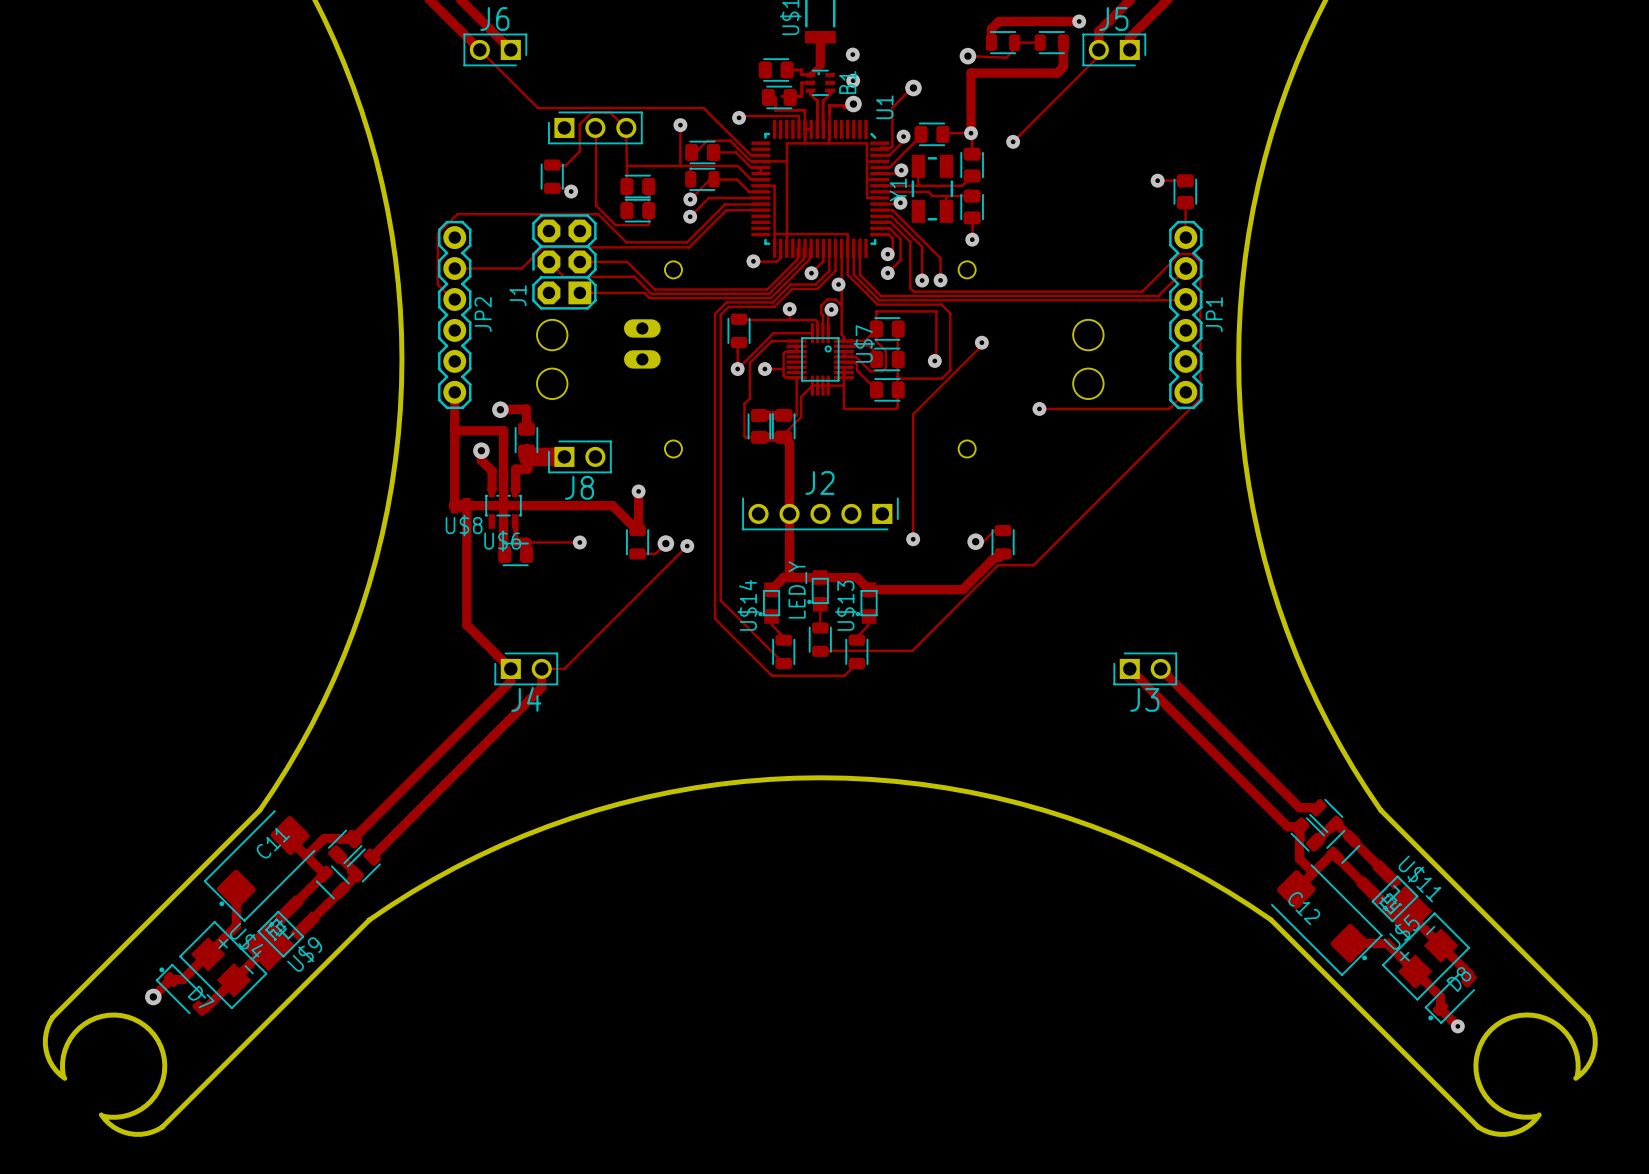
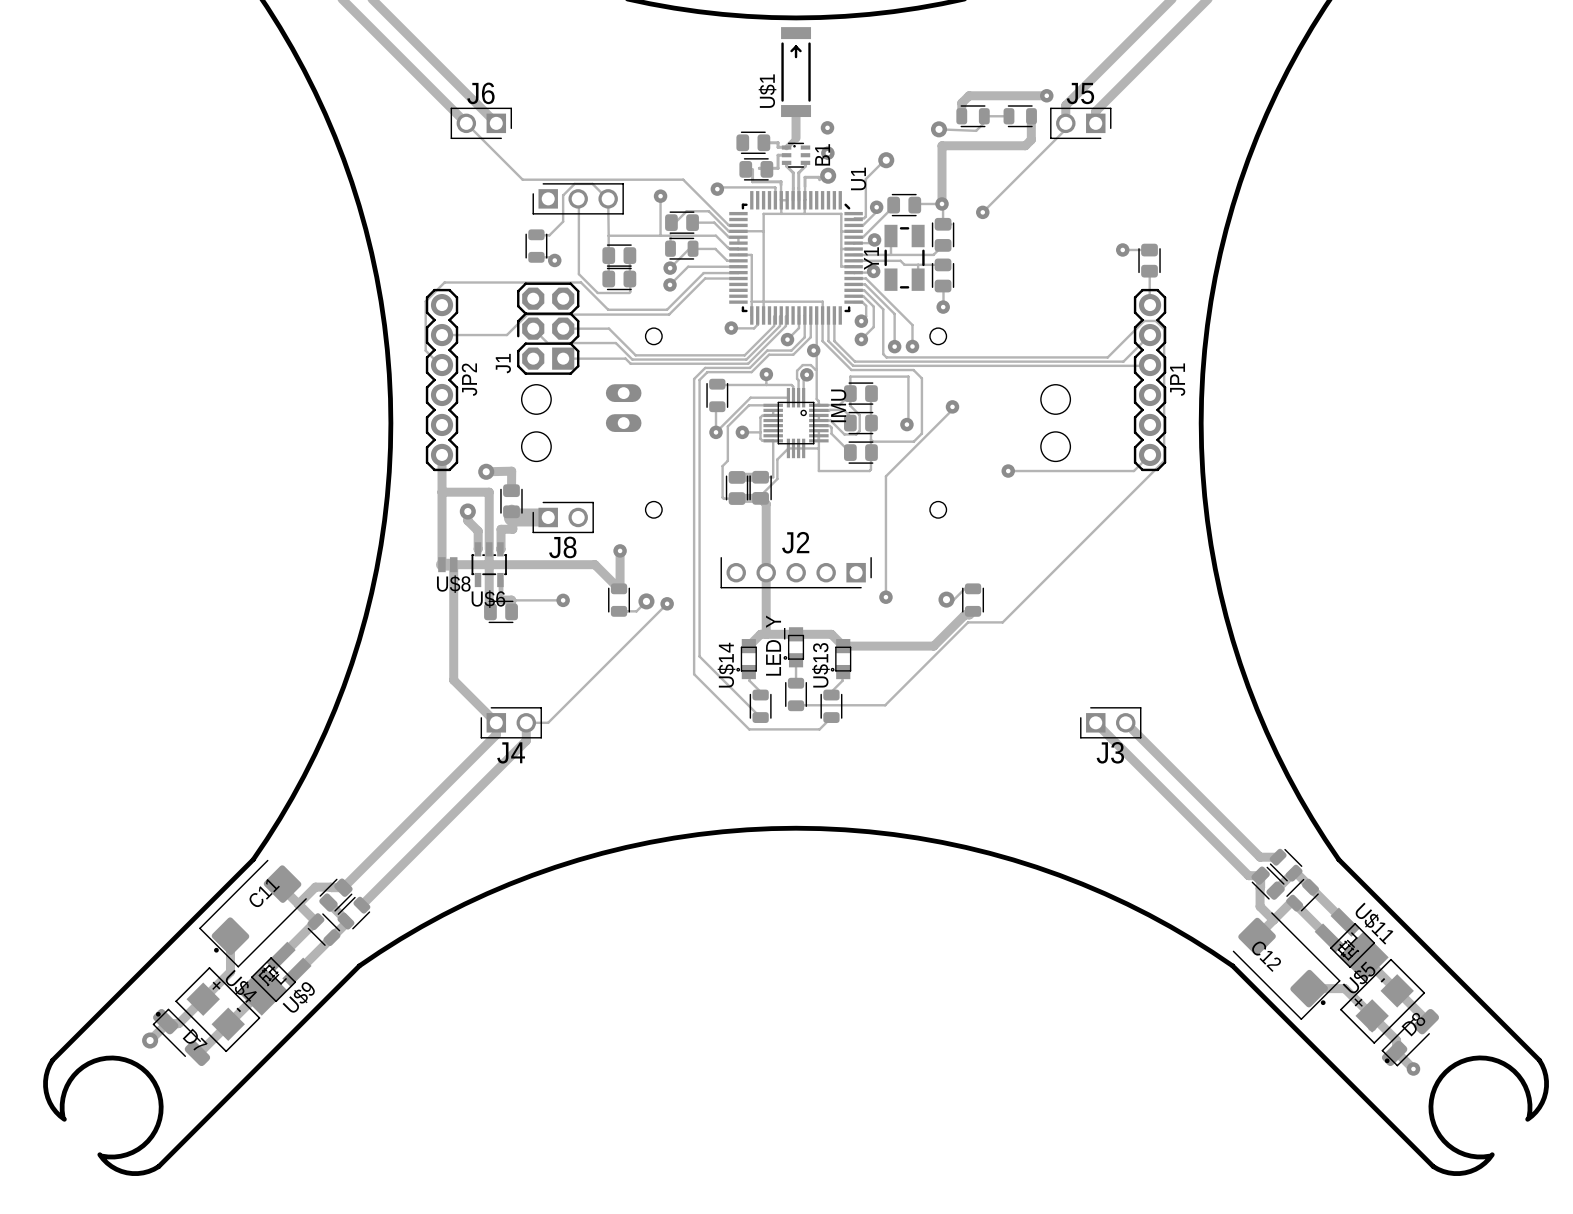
U$7 name: U$7 (864, 343) -> IMU (838, 405)
D7 footprint: [156, 964, 209, 1017] -> [152, 1008, 211, 1067]
D8 footprint: [1425, 971, 1477, 1024] -> [1381, 1008, 1440, 1067]

